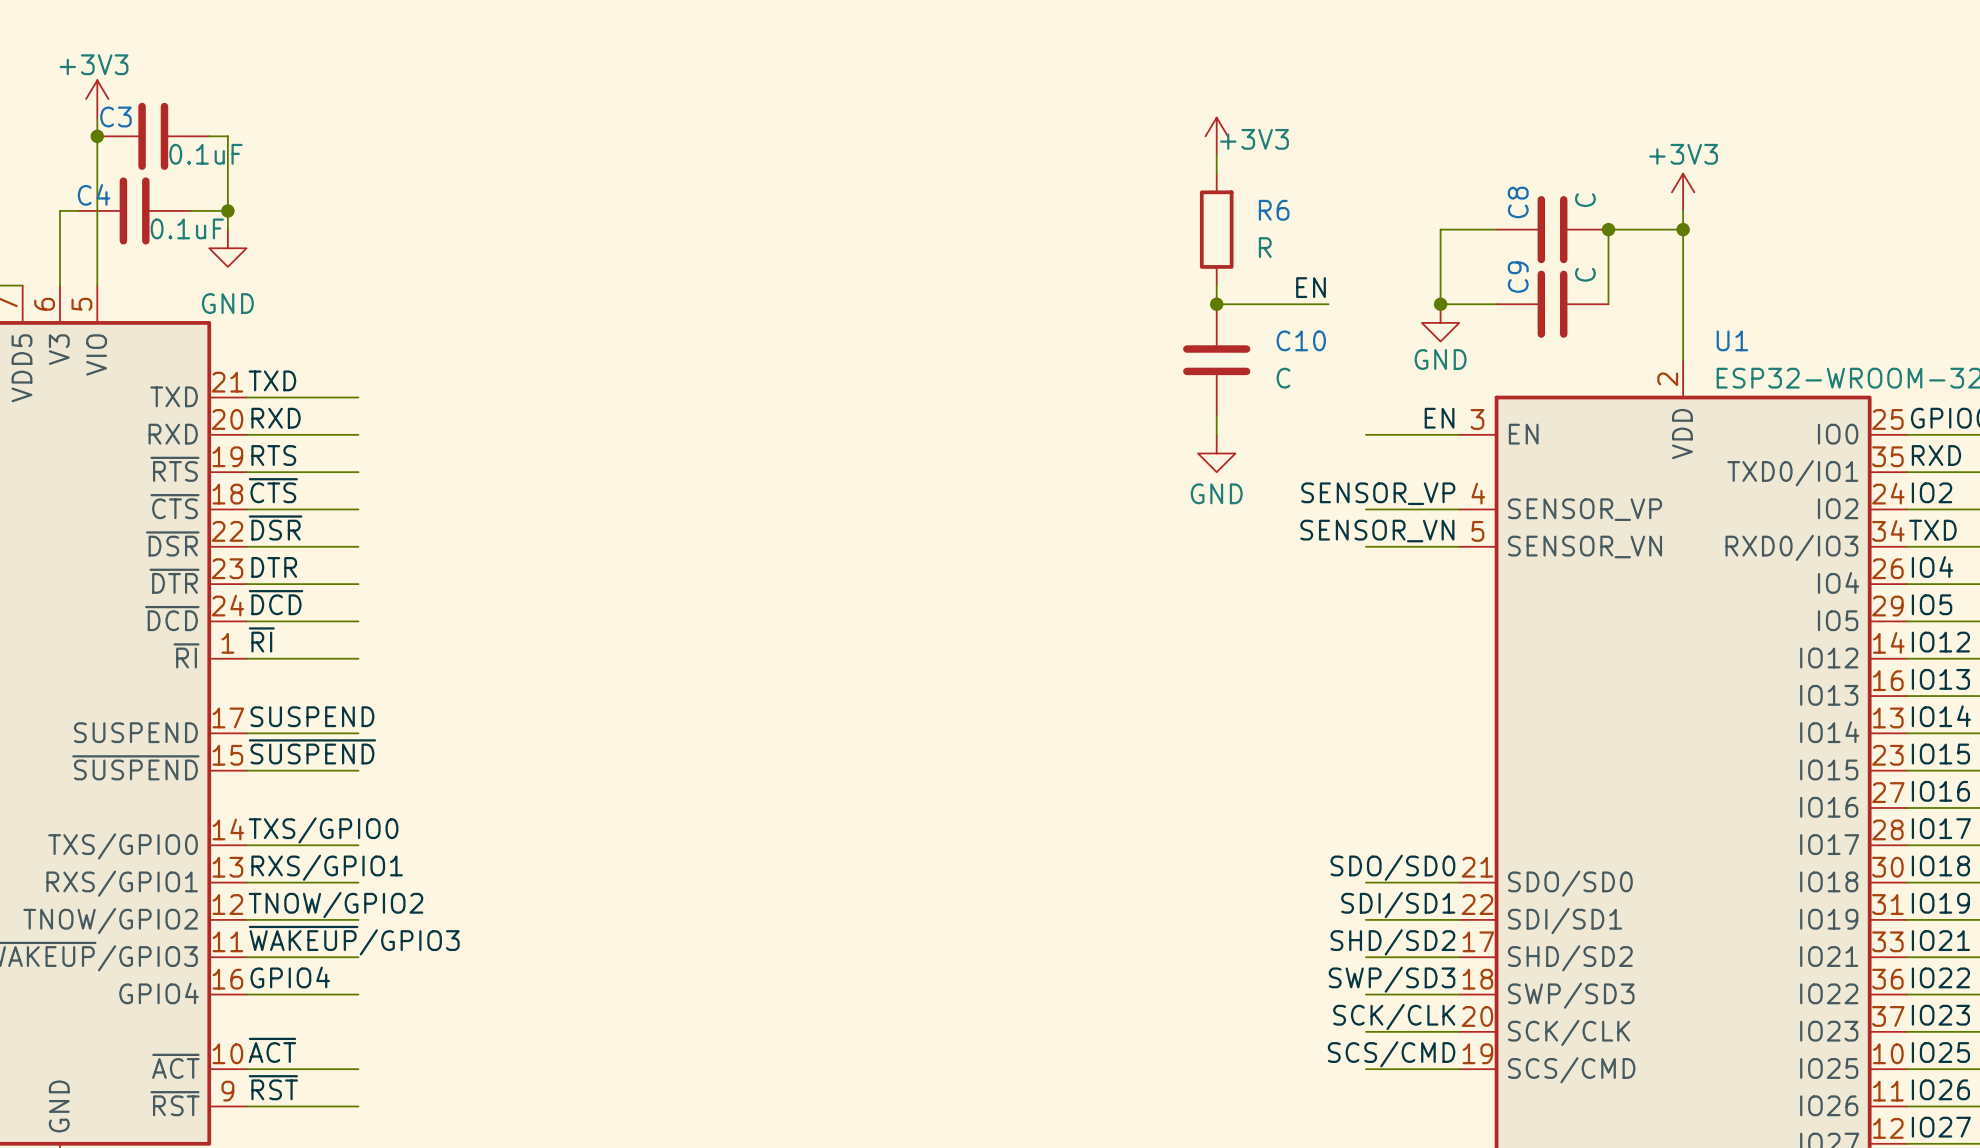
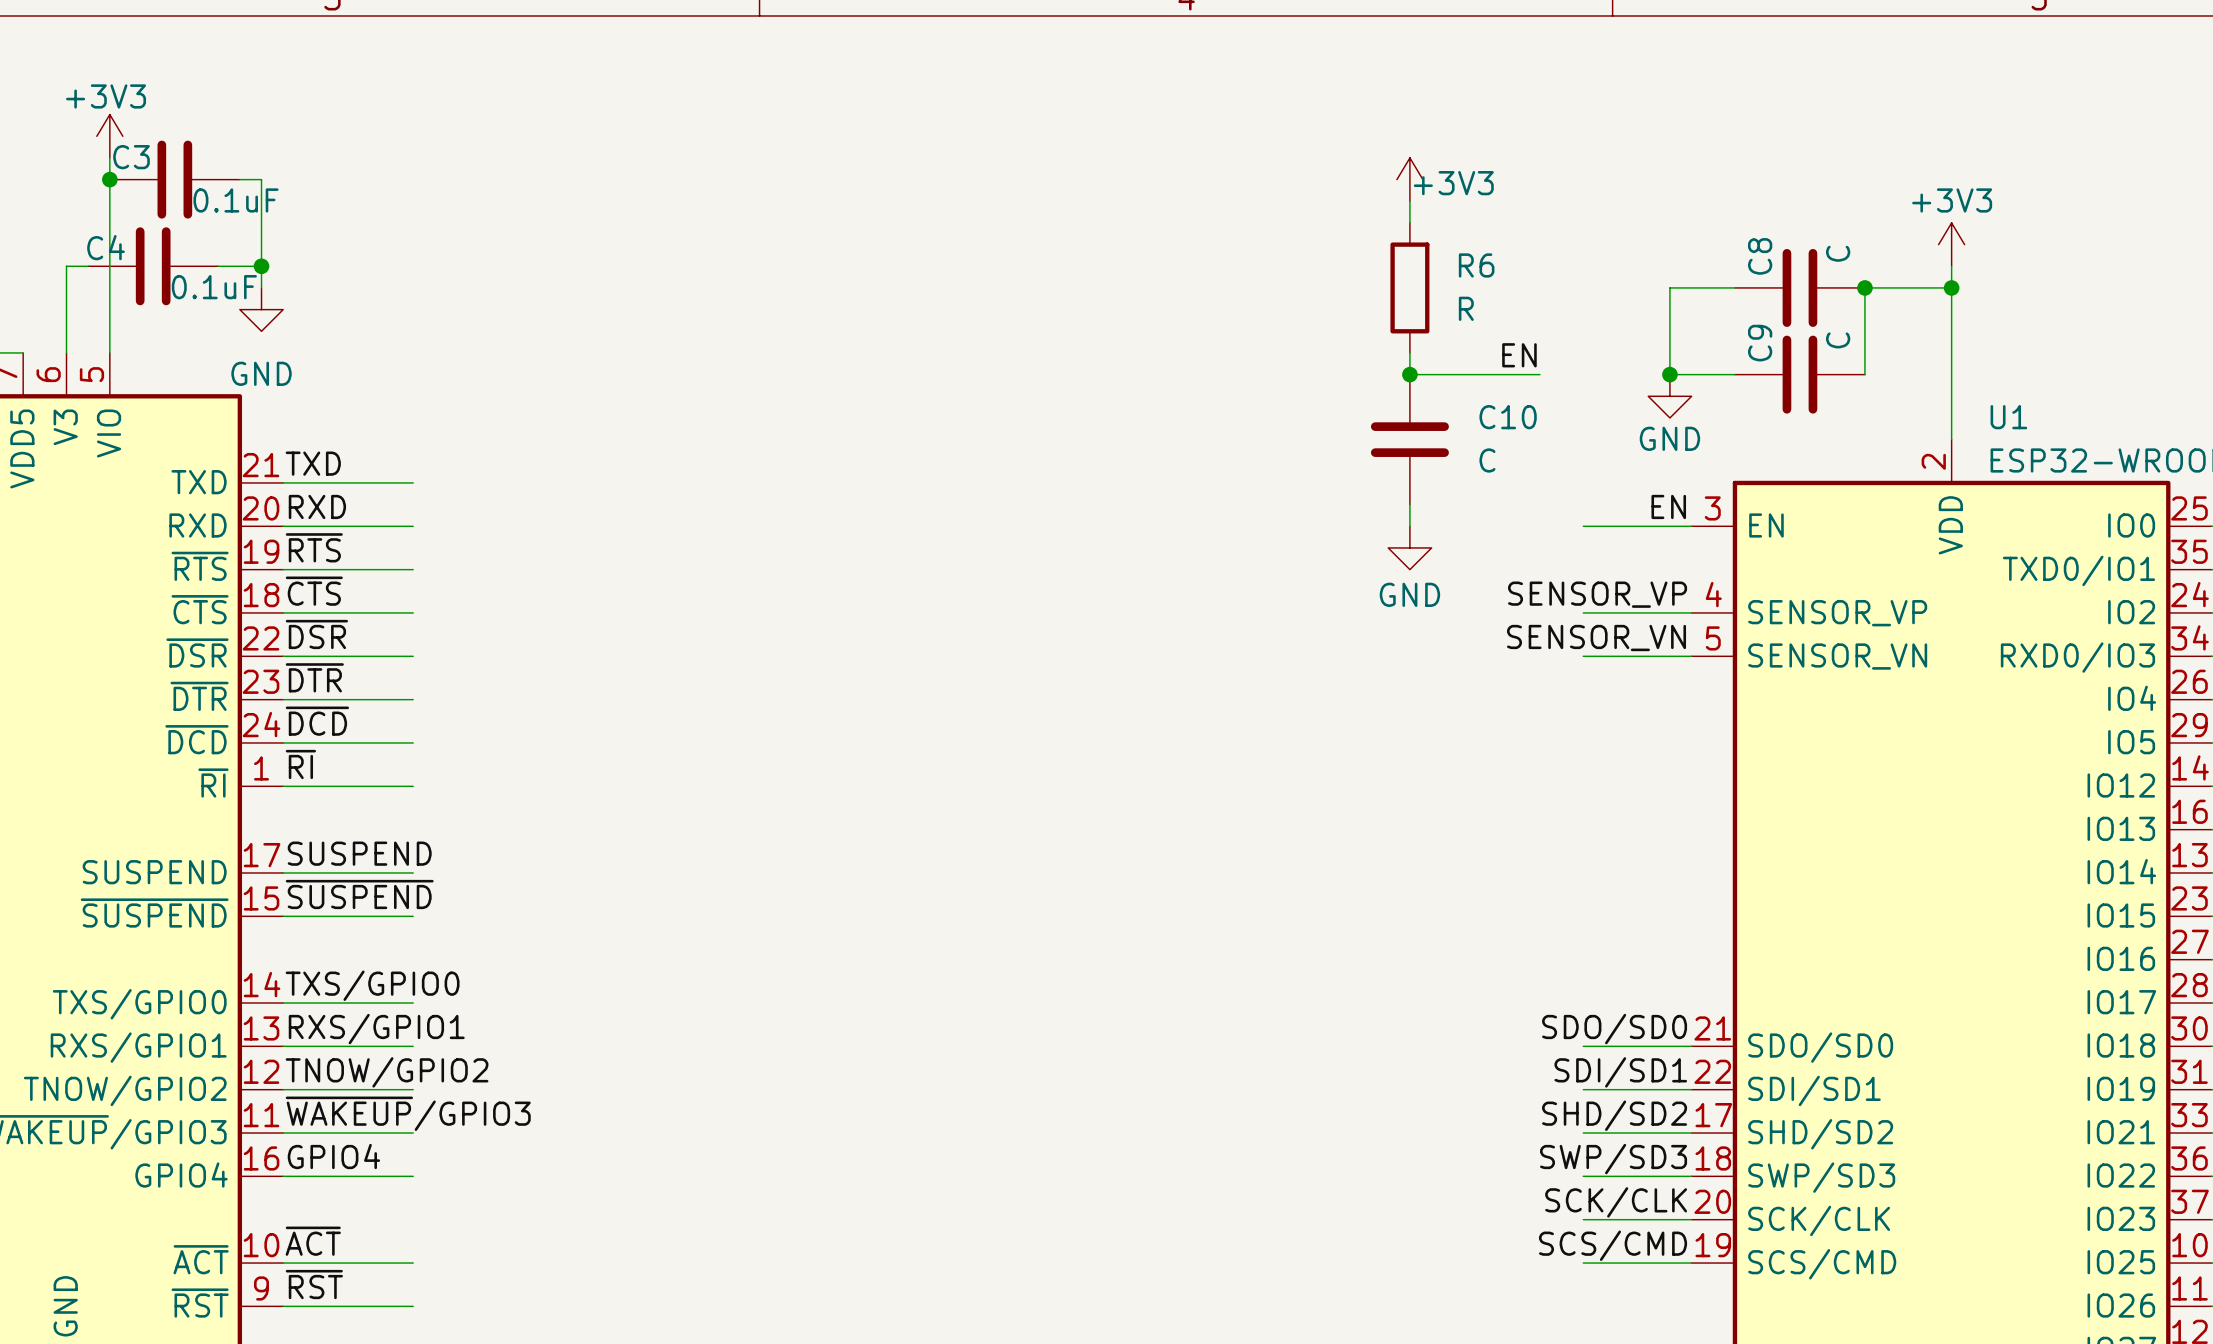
label: RTS (273, 455) -> ~{RTS} (314, 547)
label: DTR (274, 567) -> ~{DTR} (314, 677)

